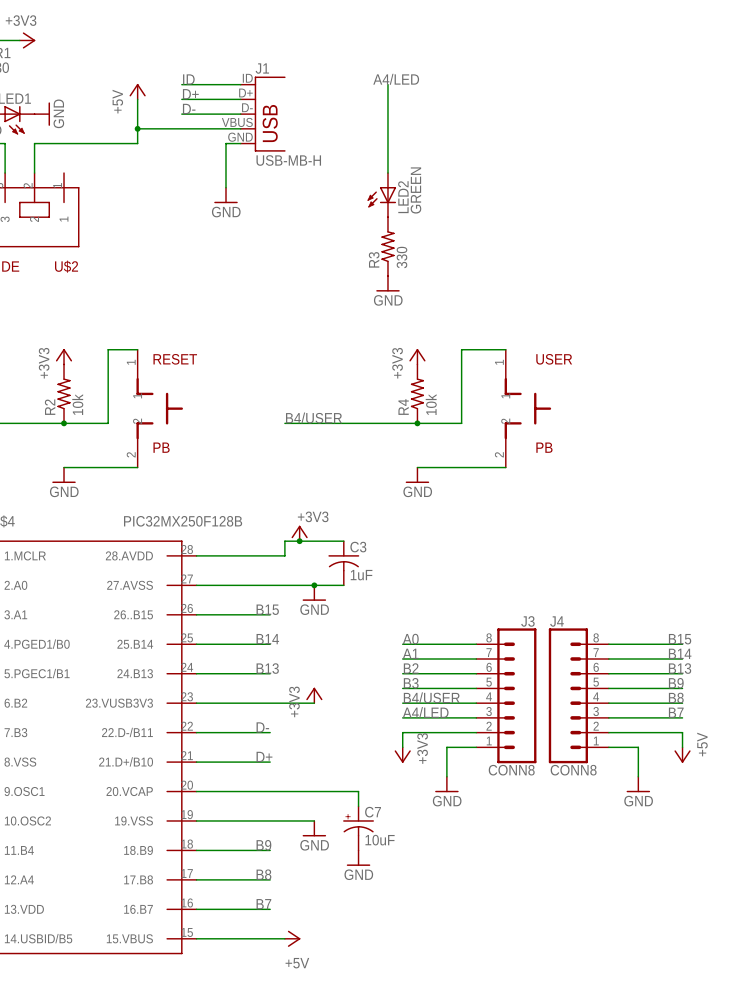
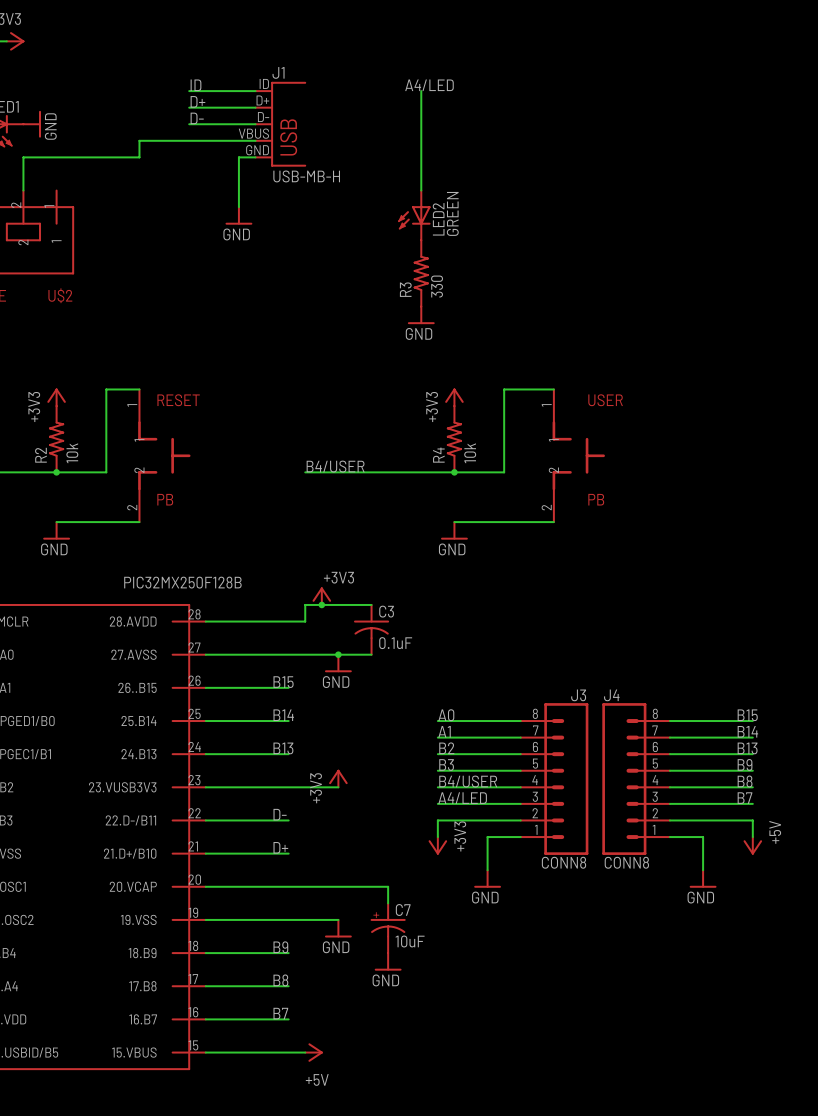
power symbol: +5V (137, 91) -> none
wire: (137, 99) (137, 128) -> none
junction: (137, 128) -> none
C3 value: 1uF (361, 575) -> 0.1uF (395, 643)

